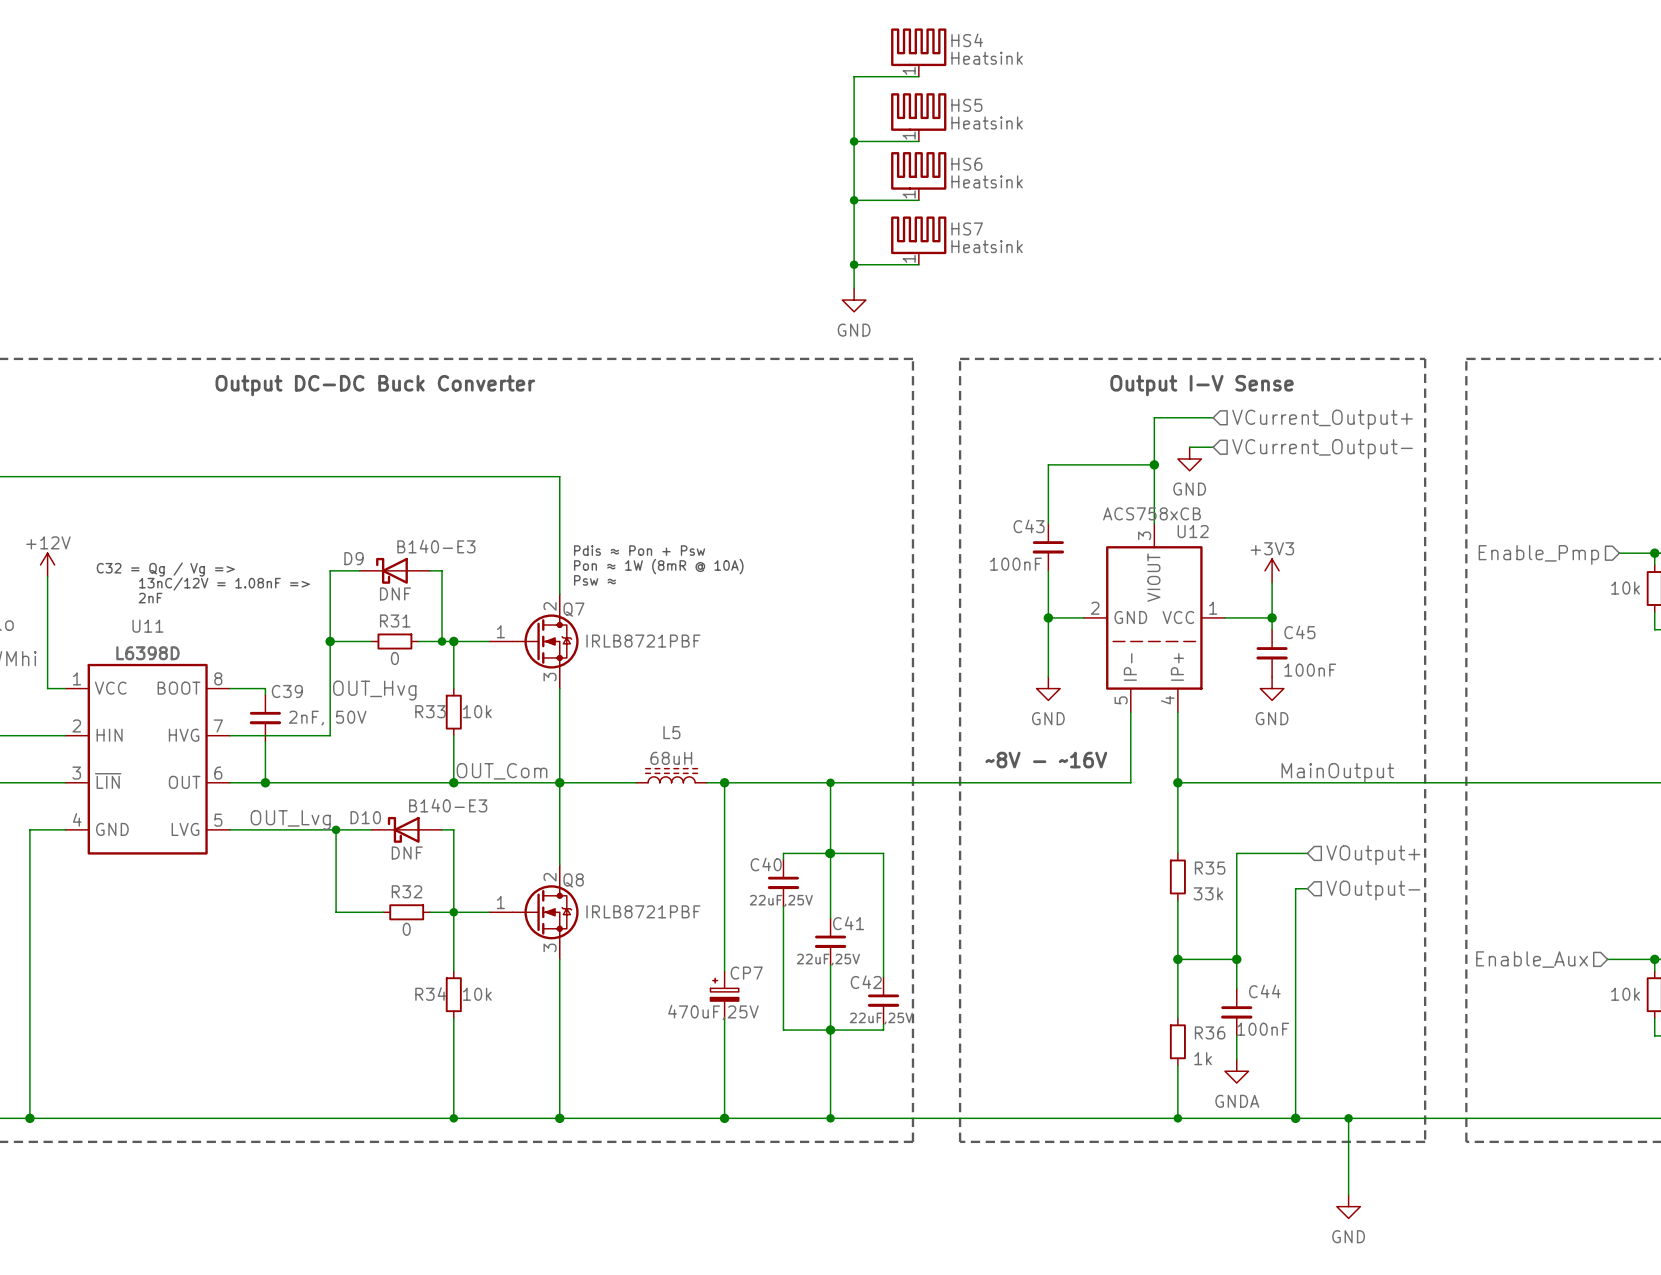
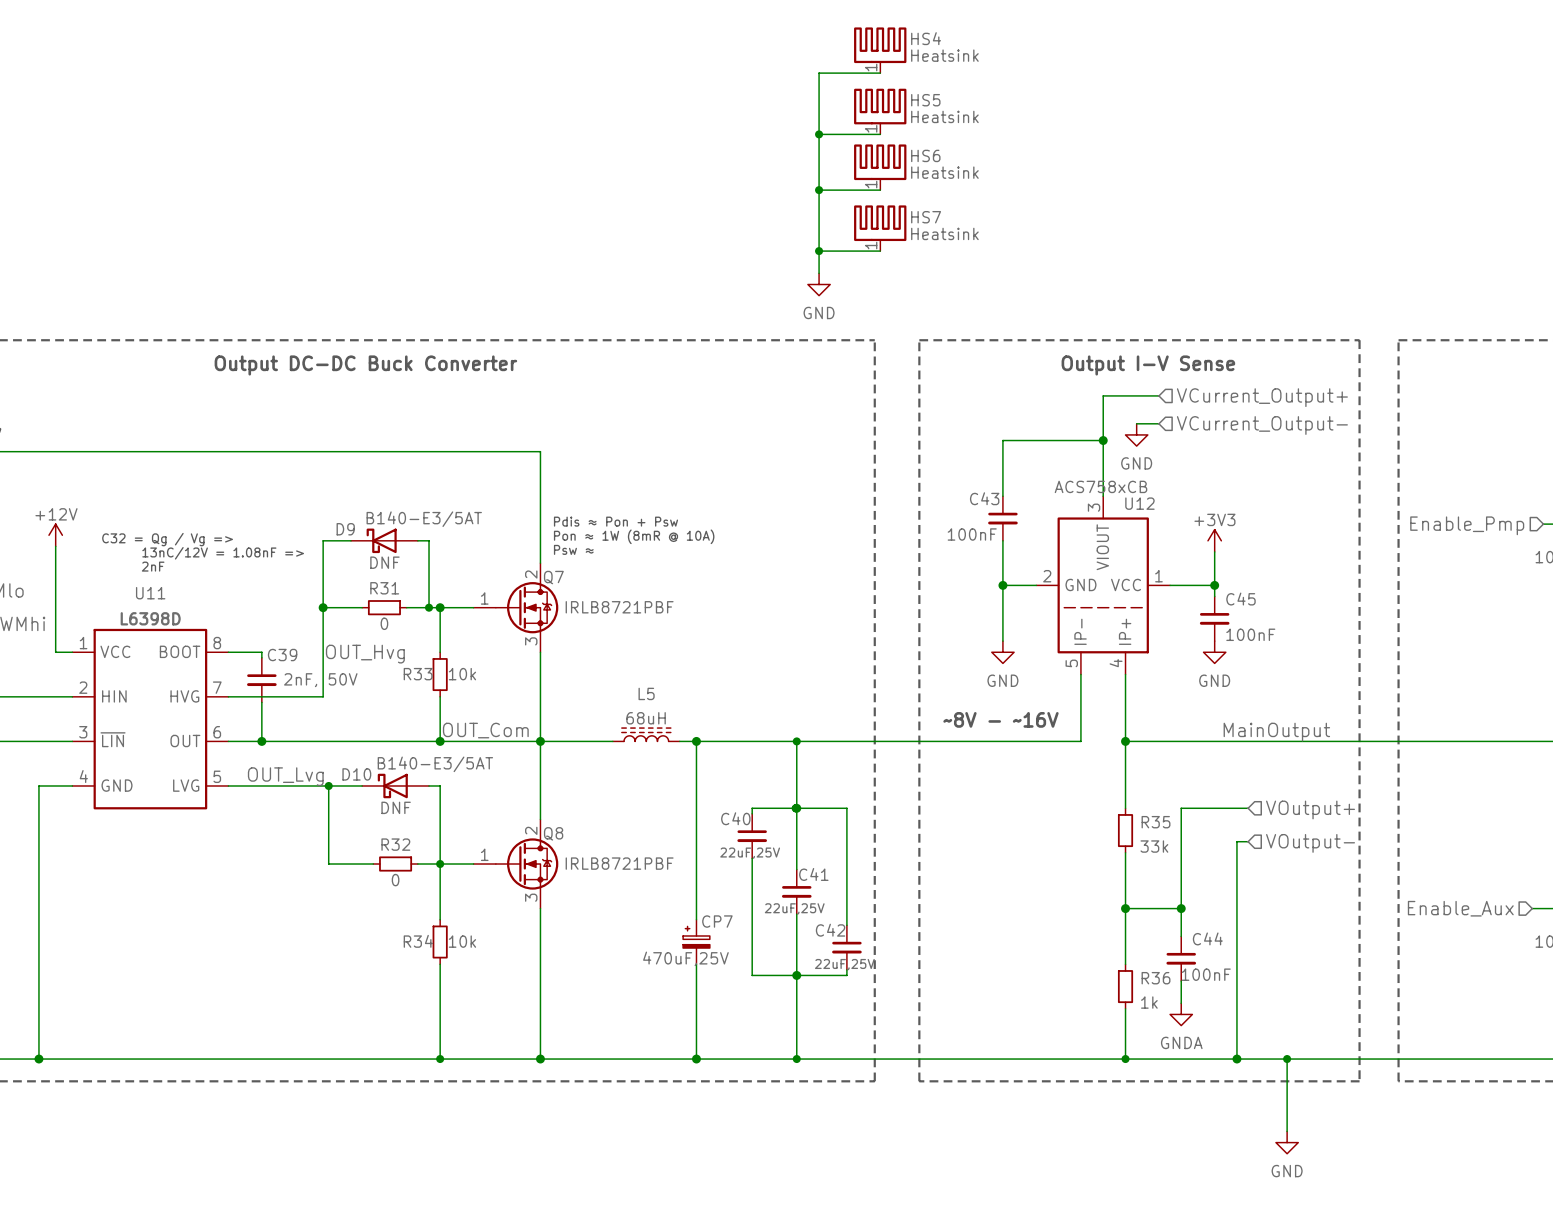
D9 value: B140-E3 (436, 546) -> B140-E3/5AT (424, 519)
D10 value: B140-E3 (448, 805) -> B140-E3/5AT (435, 764)

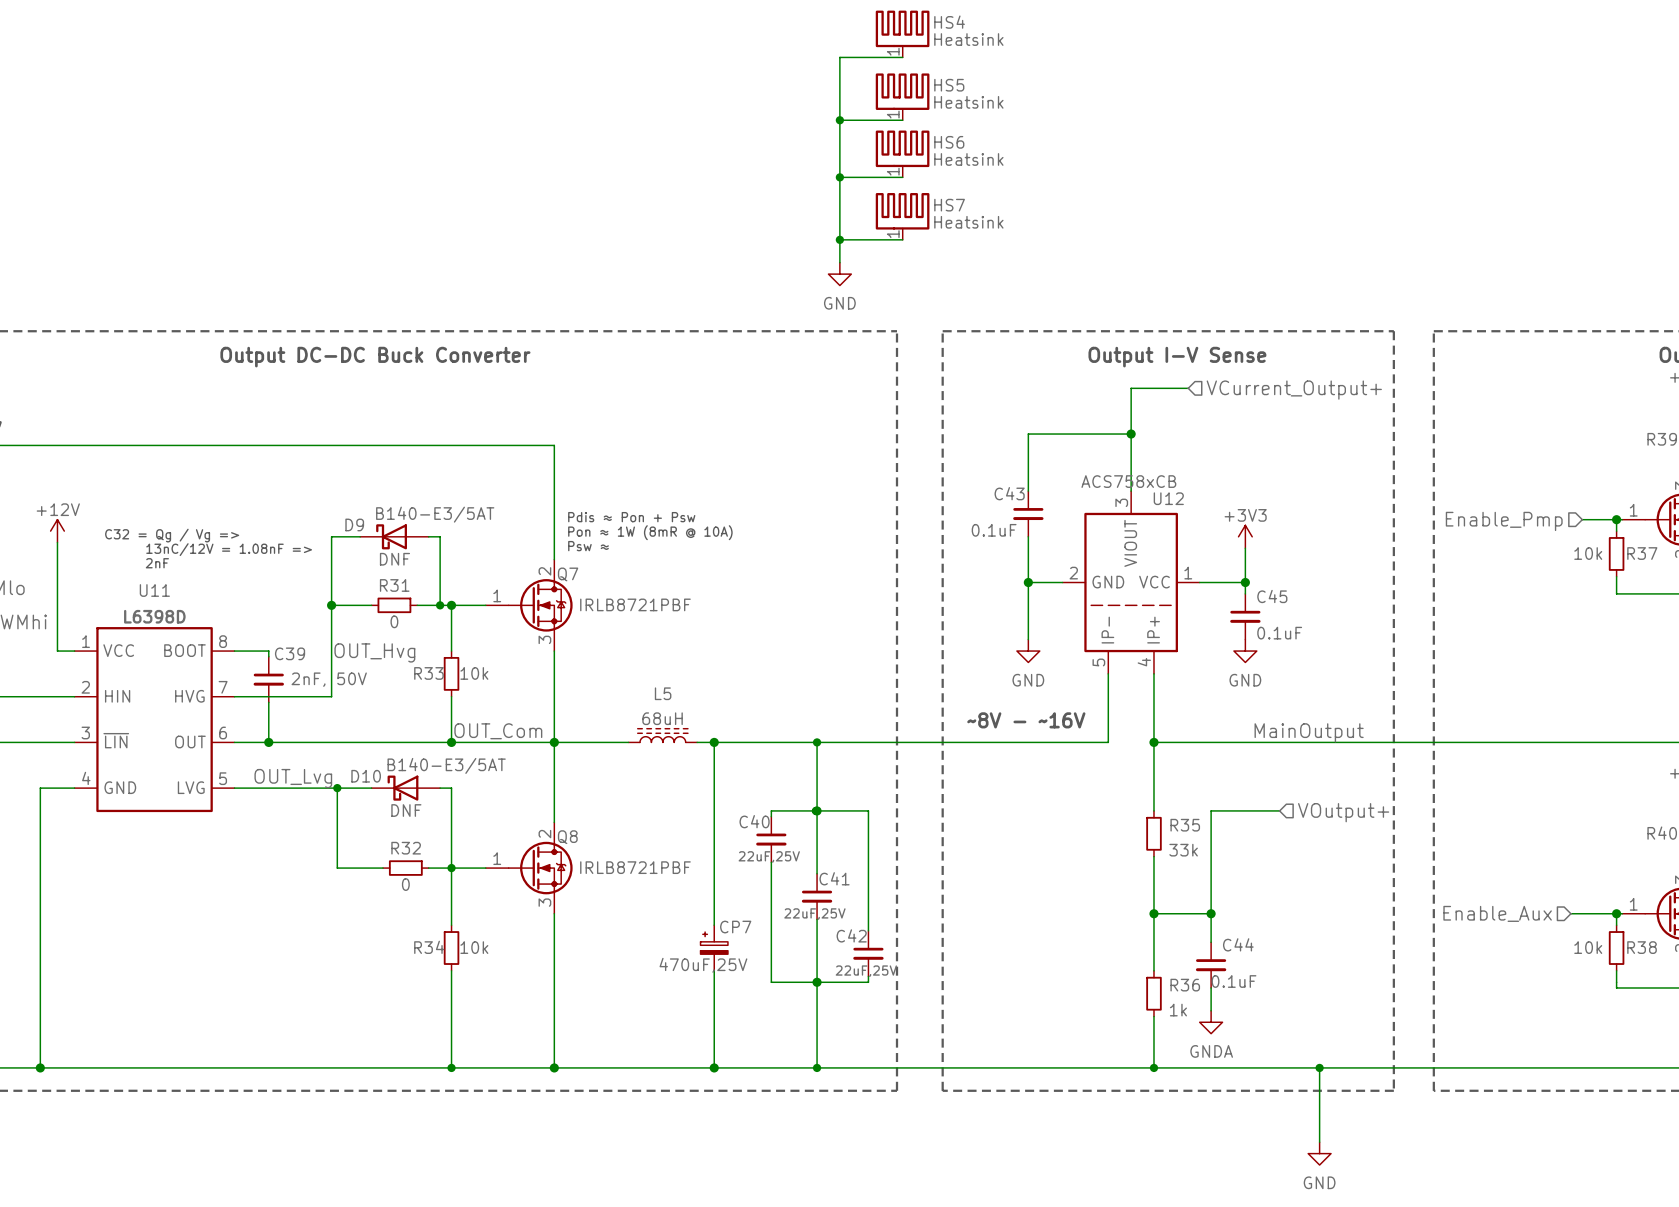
wire: (1136, 423) (1158, 423) -> none
hierarchical label: VCurrent_Output- (1262, 425) -> none
power symbol: GND (1136, 434) -> none
C43 value: 100nF (972, 534) -> 0.1uF (994, 530)
C45 value: 100nF (1250, 634) -> 0.1uF (1279, 633)
wire: (1248, 841) (1236, 841) (1236, 1059) -> none
hierarchical label: VOutput- (1310, 843) -> none
C44 value: 100nF (1206, 974) -> 0.1uF (1233, 981)
junction: (1236, 1059) -> none

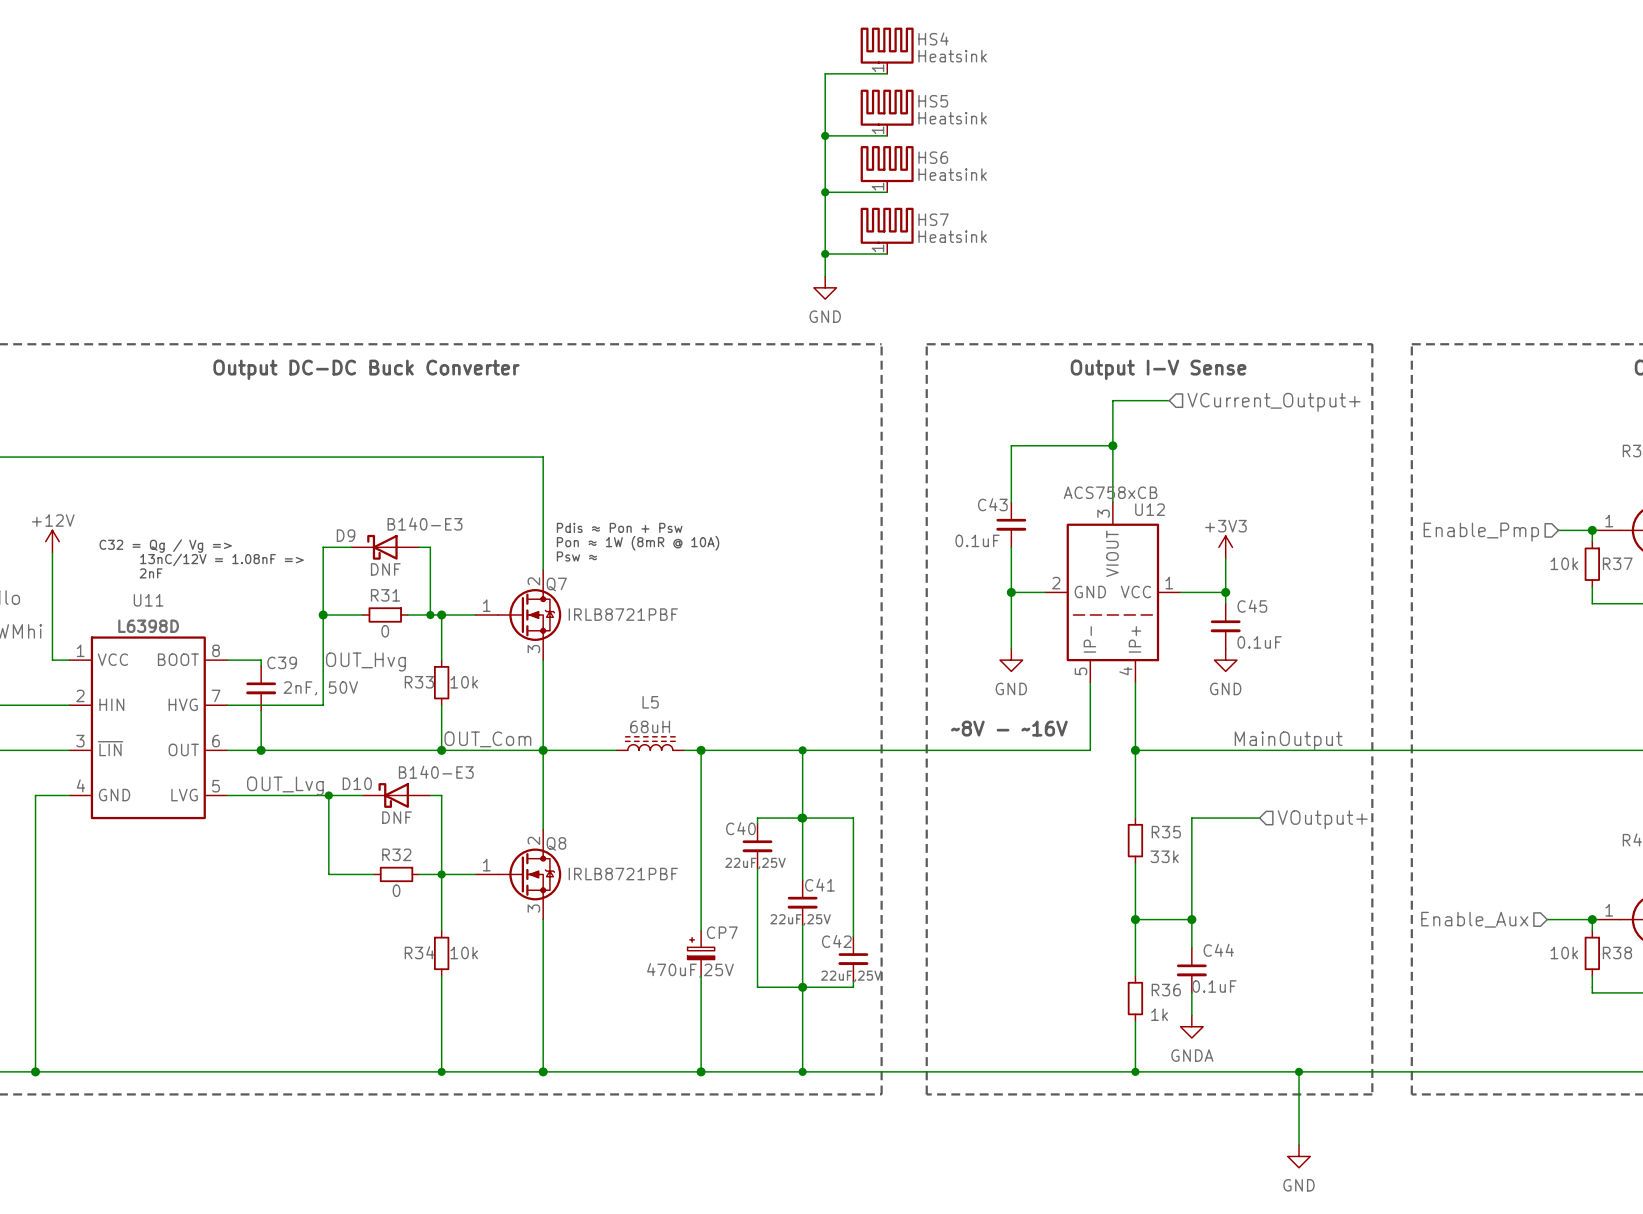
D9 value: B140-E3/5AT (435, 514) -> B140-E3 (425, 524)
D10 value: B140-E3/5AT (446, 765) -> B140-E3 (436, 772)

